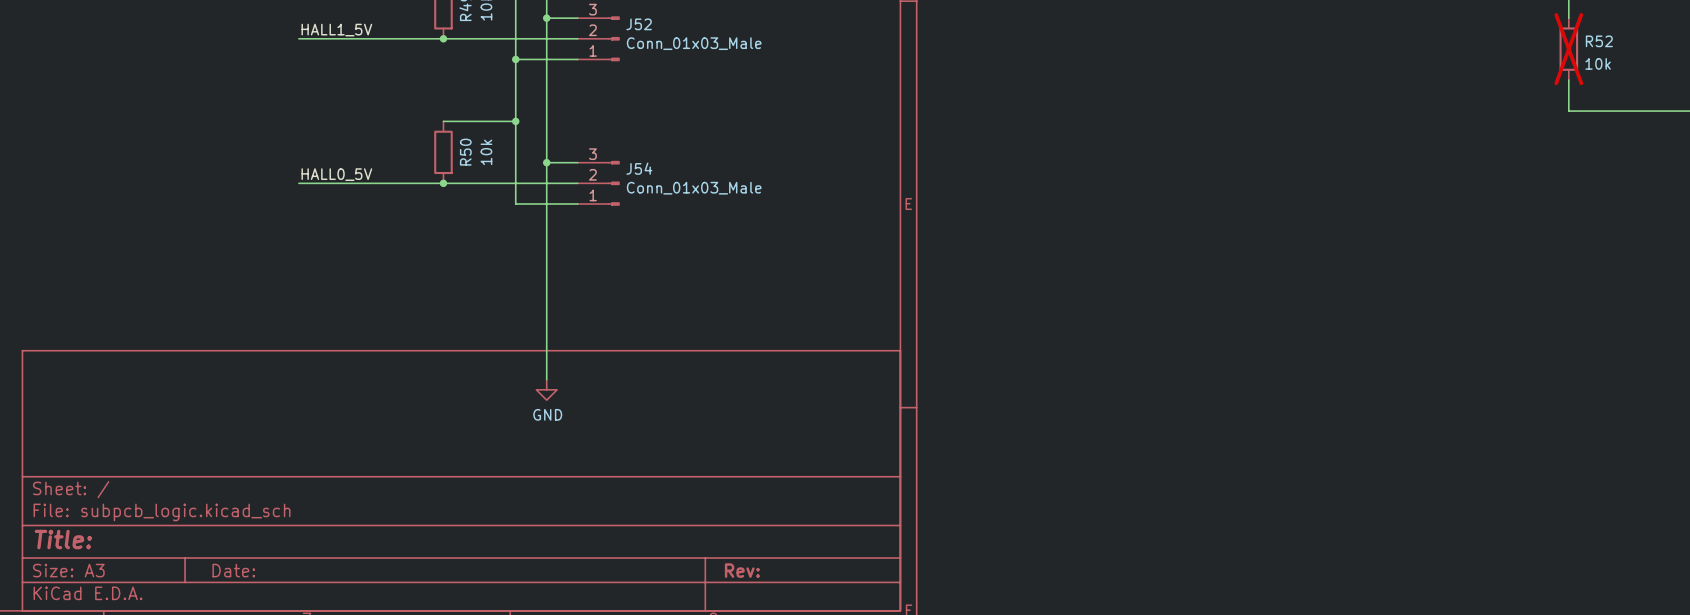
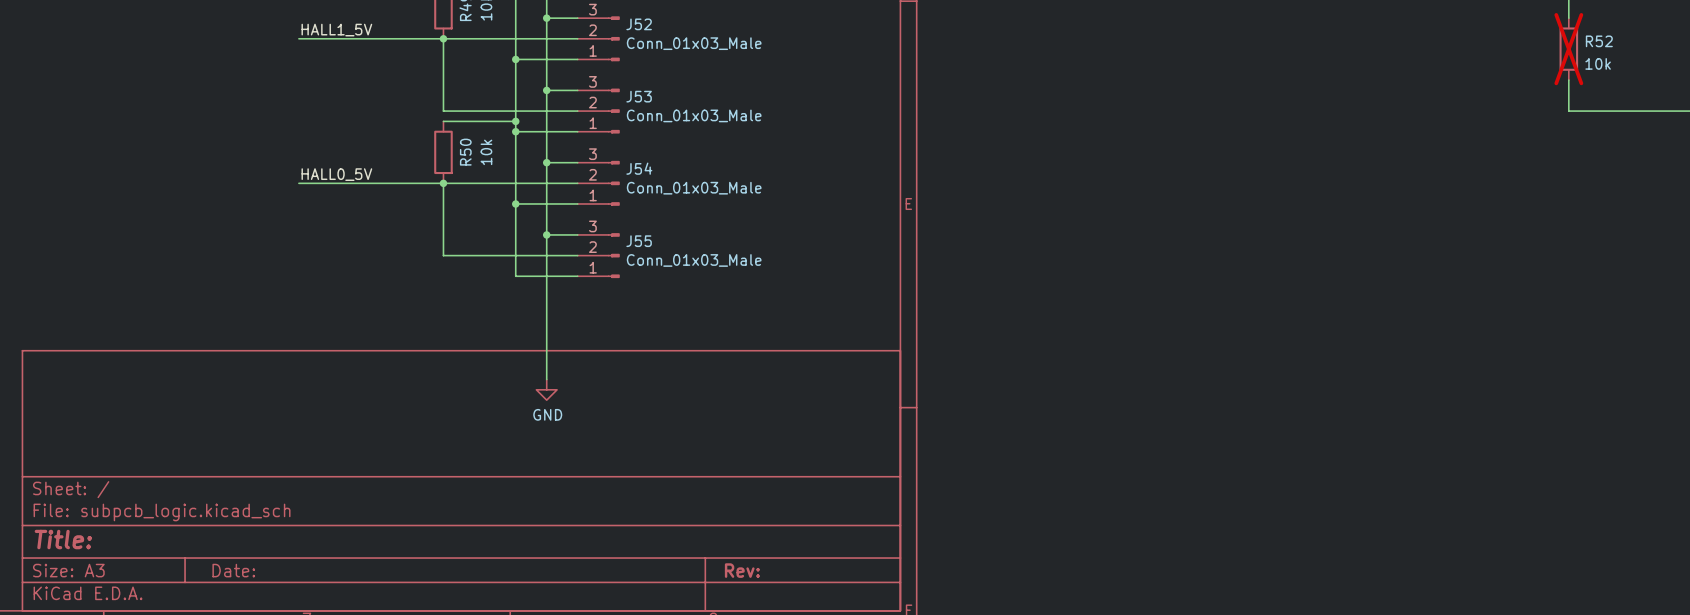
wire: none -> (443, 38) (443, 111) (577, 111)
wire: none -> (546, 90) (577, 90)
junction: none -> (546, 90)
J53: none -> Conn_01x03_Male (598, 111)
wire: none -> (515, 131) (577, 131)
junction: none -> (515, 131)
wire: none -> (443, 183) (443, 255) (577, 255)
wire: none -> (515, 203) (515, 276) (577, 276)
junction: none -> (515, 203)
wire: none -> (546, 234) (577, 234)
junction: none -> (546, 234)
J55: none -> Conn_01x03_Male (598, 255)

